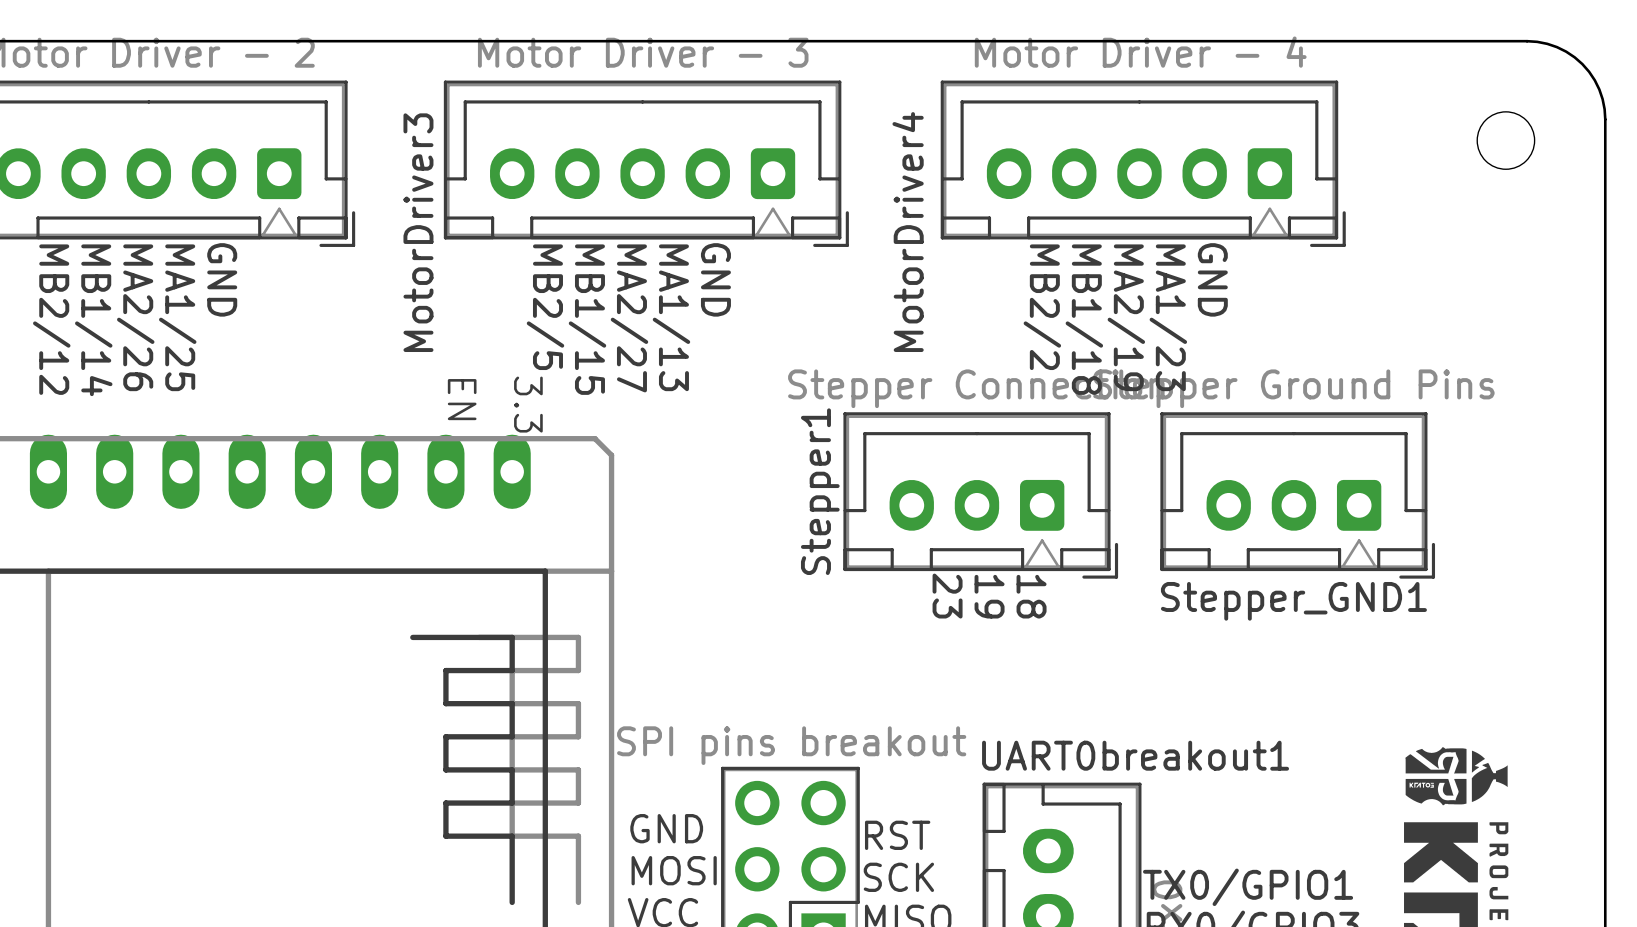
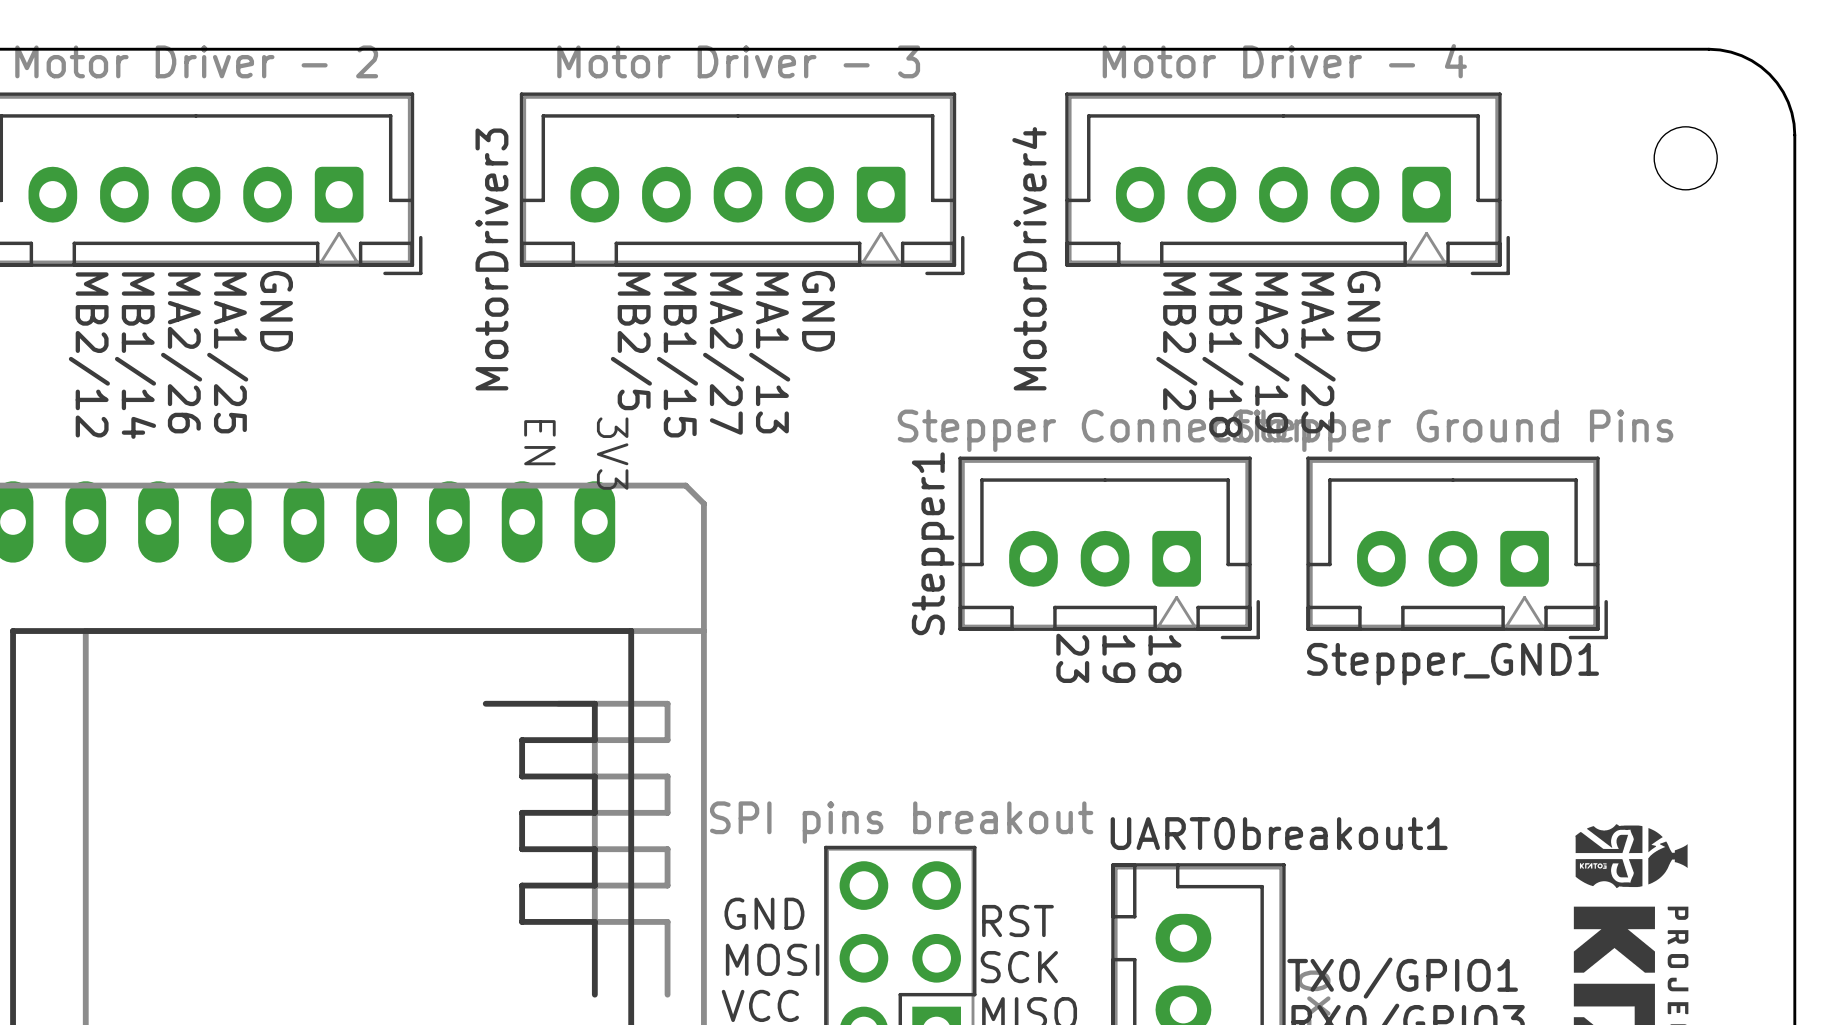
part text: 3.3 (528, 404) -> 3V3 (612, 453)

